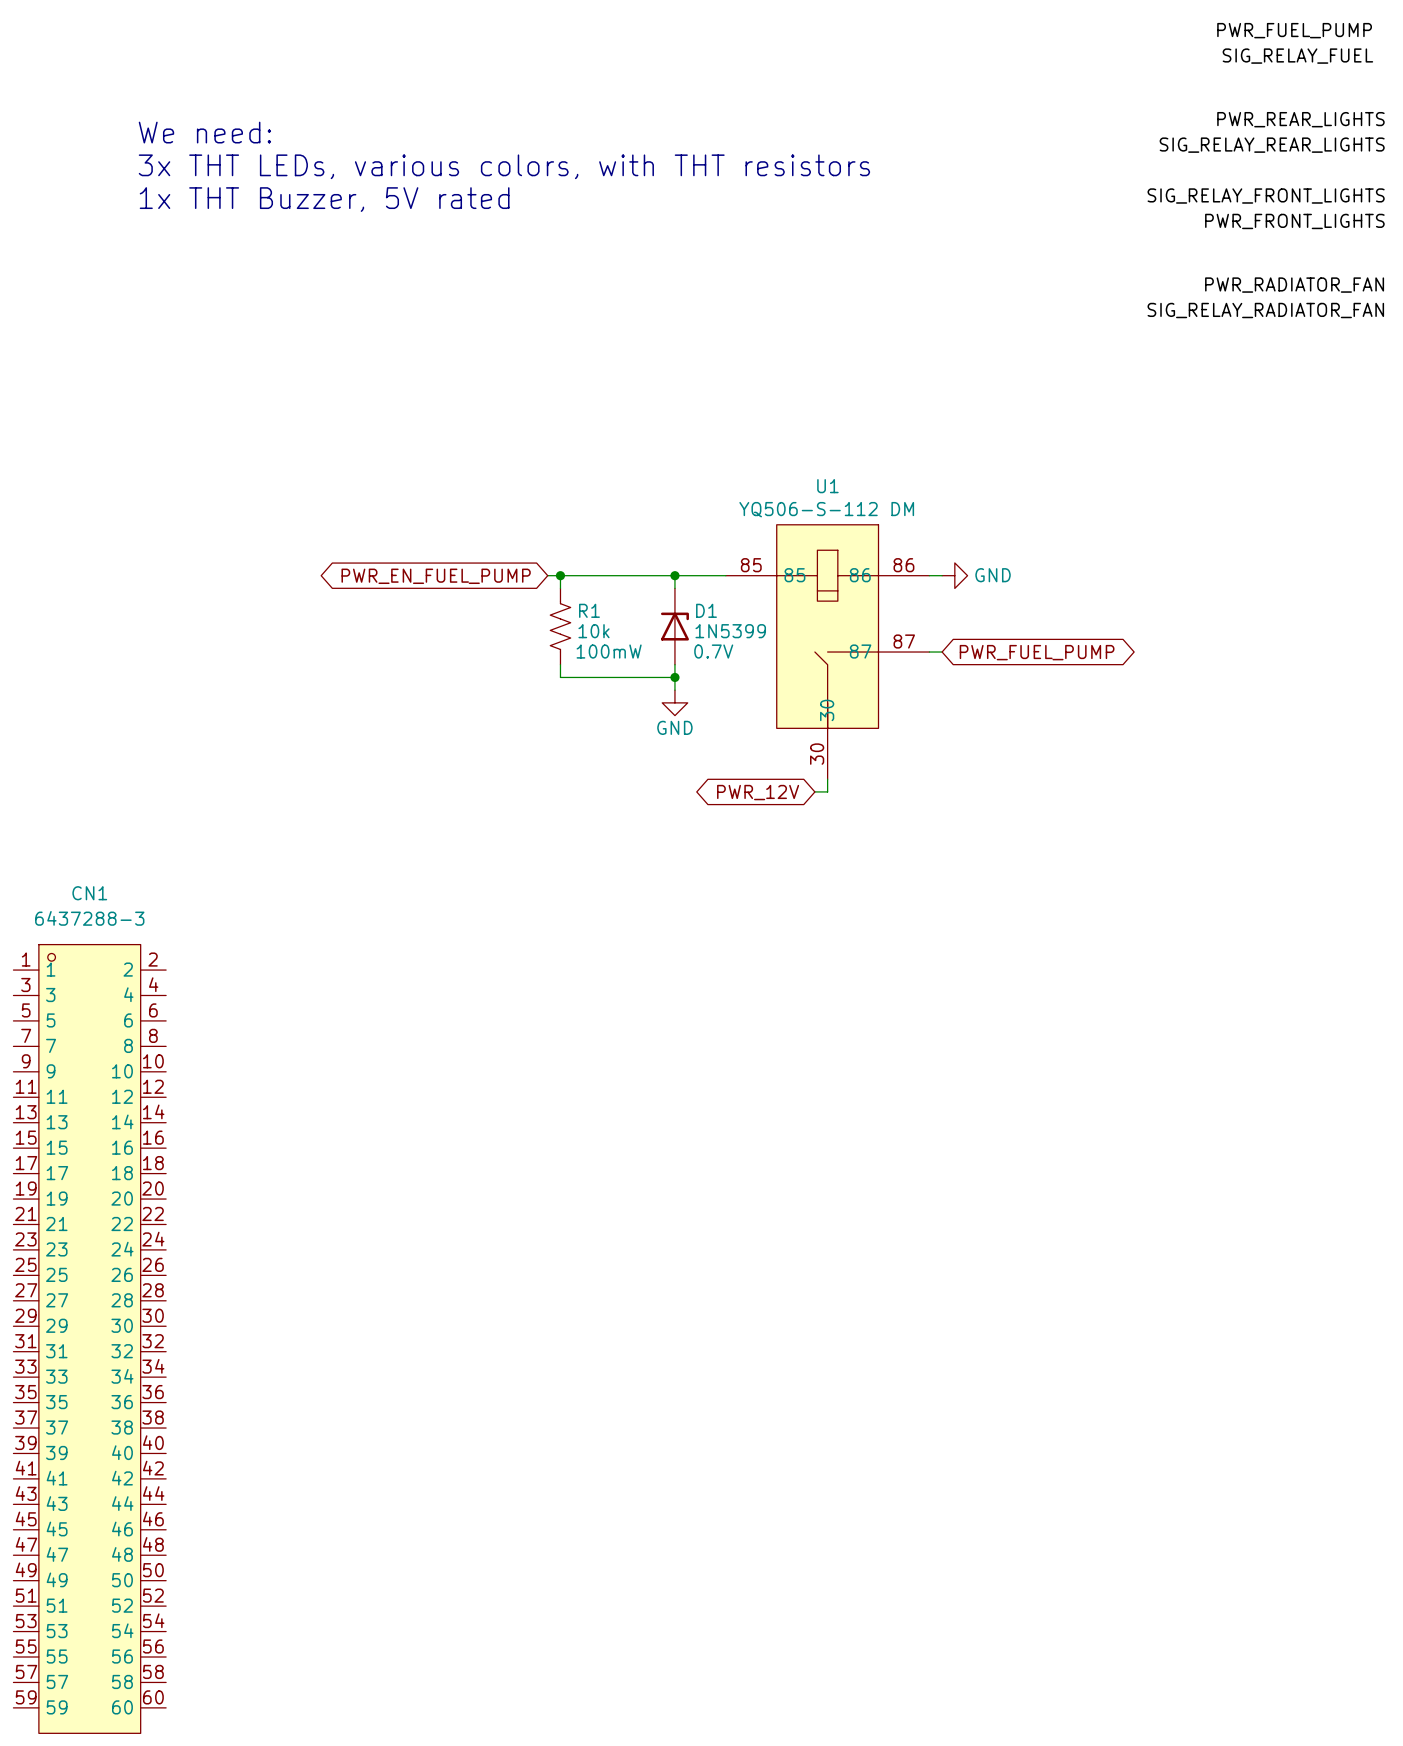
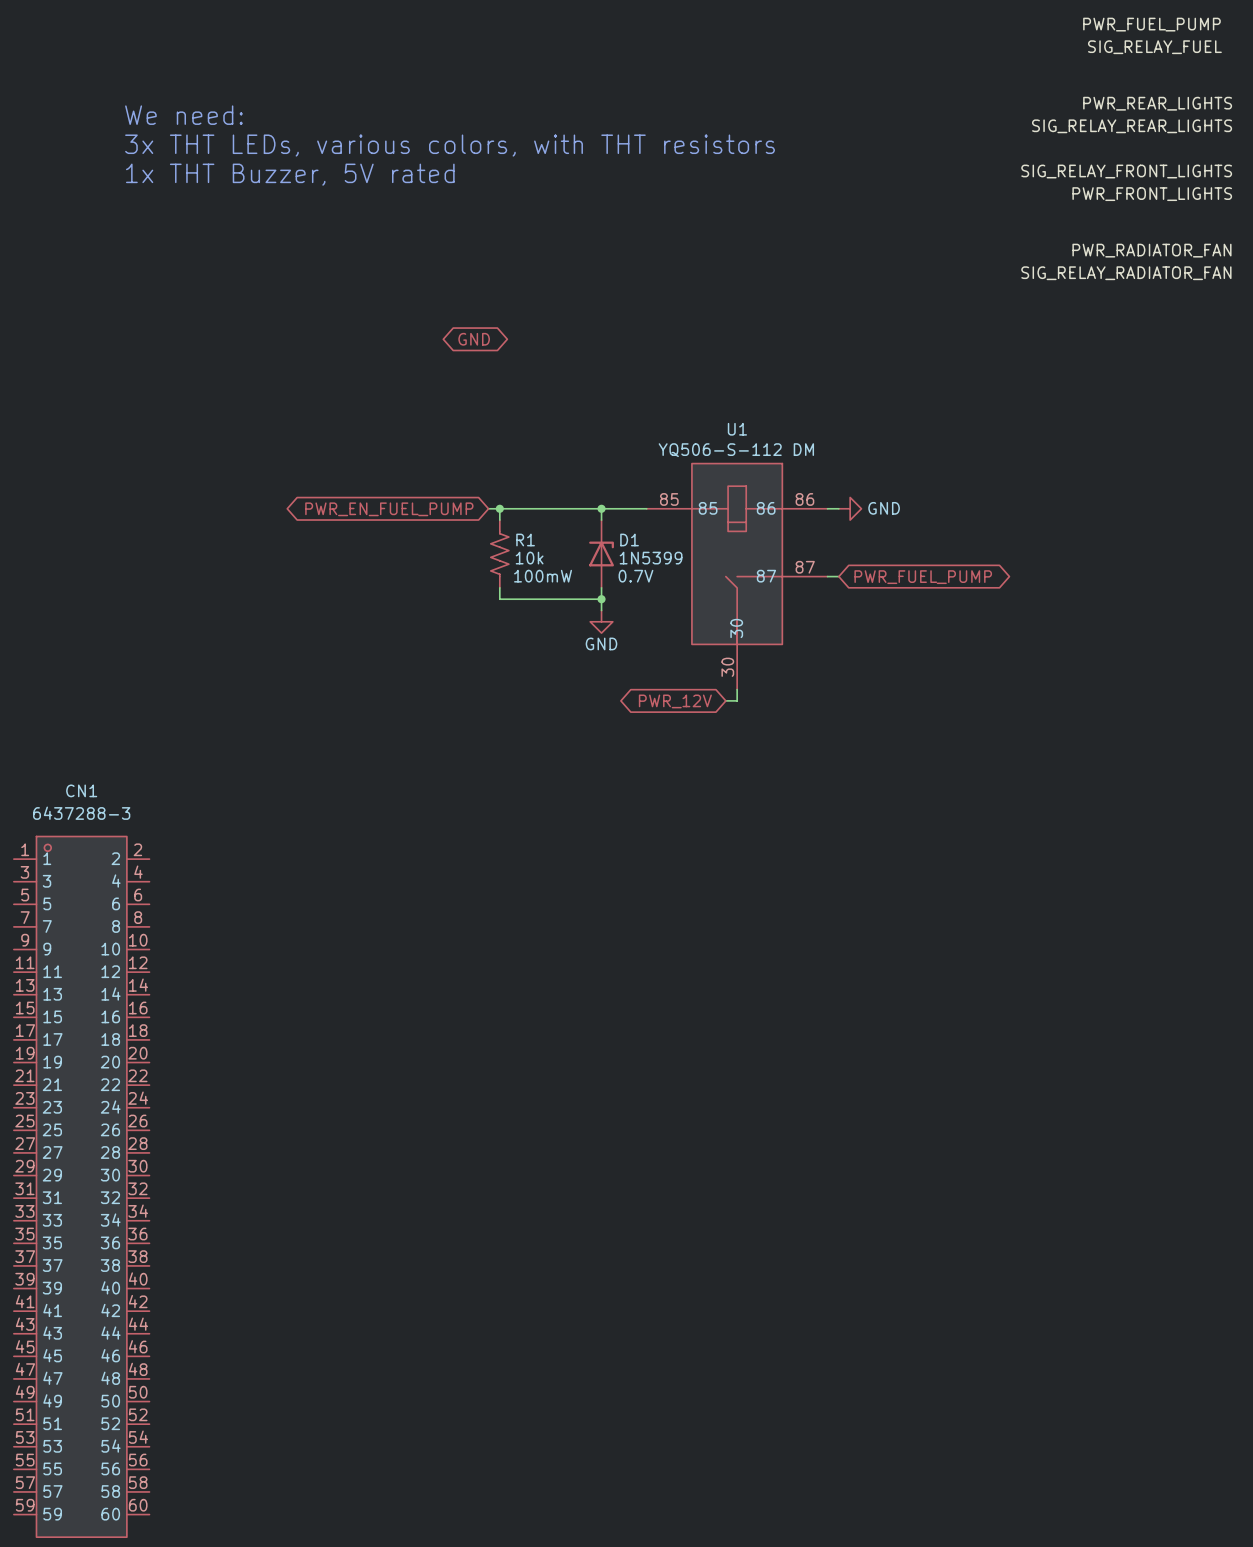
global label: none -> GND (474, 339)

